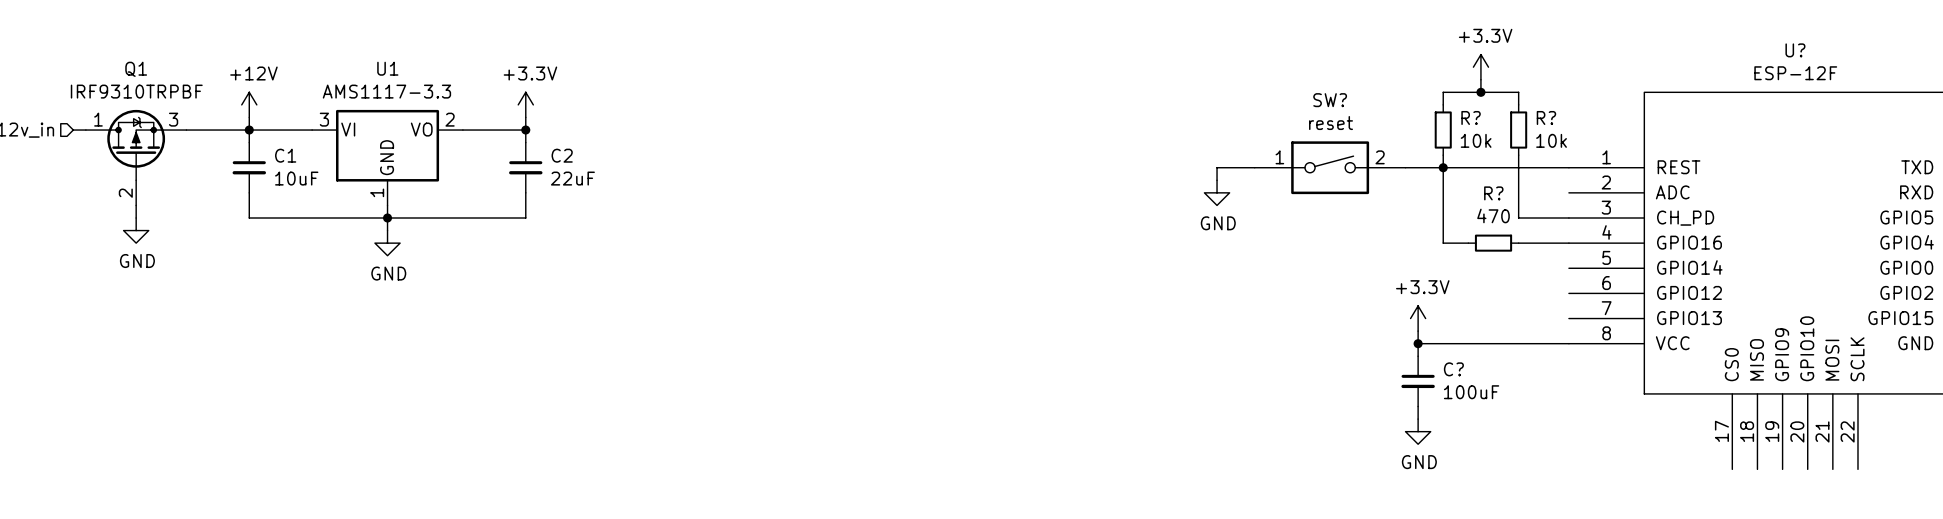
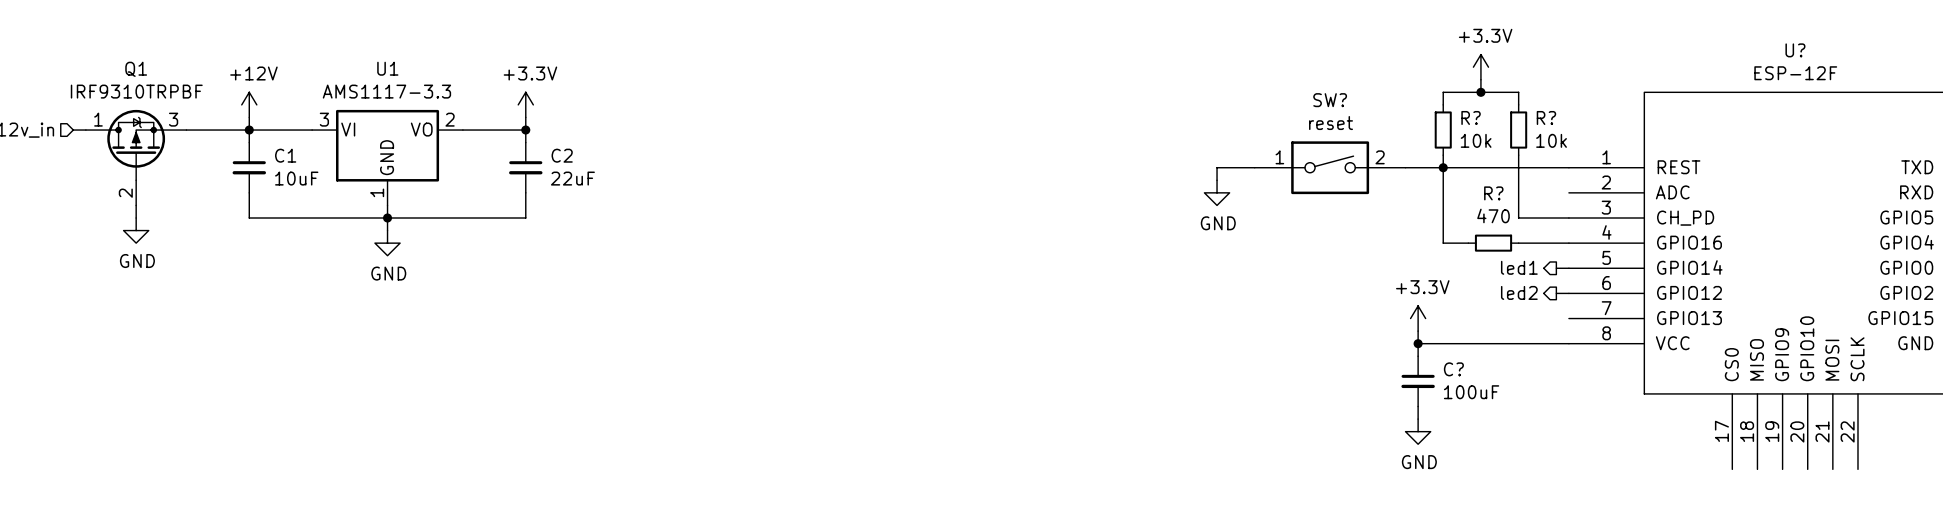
hierarchical label: none -> led1 (1519, 267)
wire: none -> (1556, 268) (1568, 268)
hierarchical label: none -> led2 (1519, 292)
wire: none -> (1556, 293) (1568, 293)

